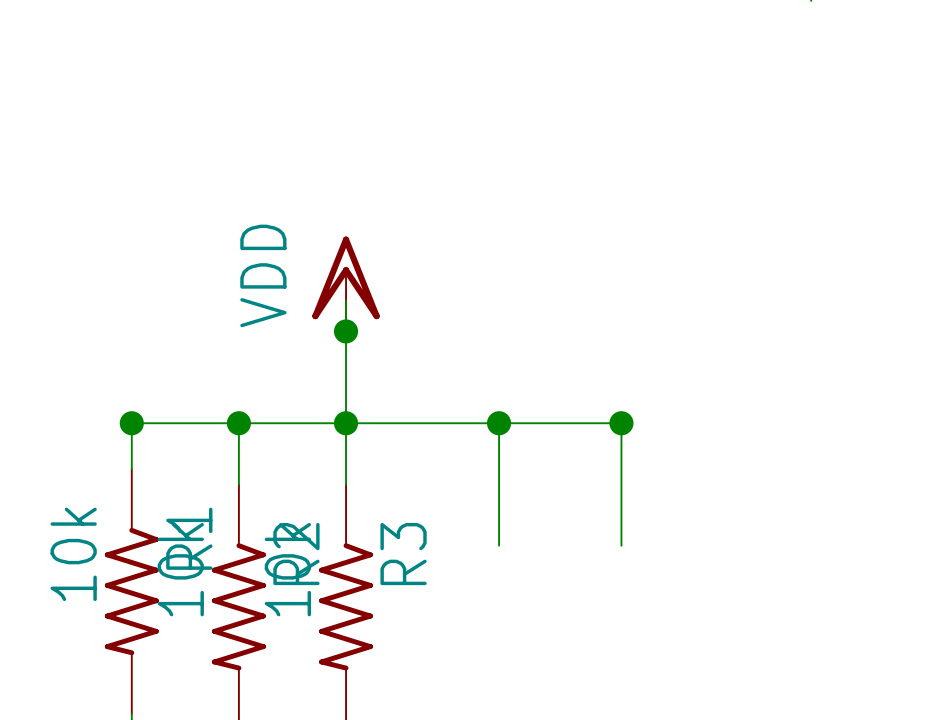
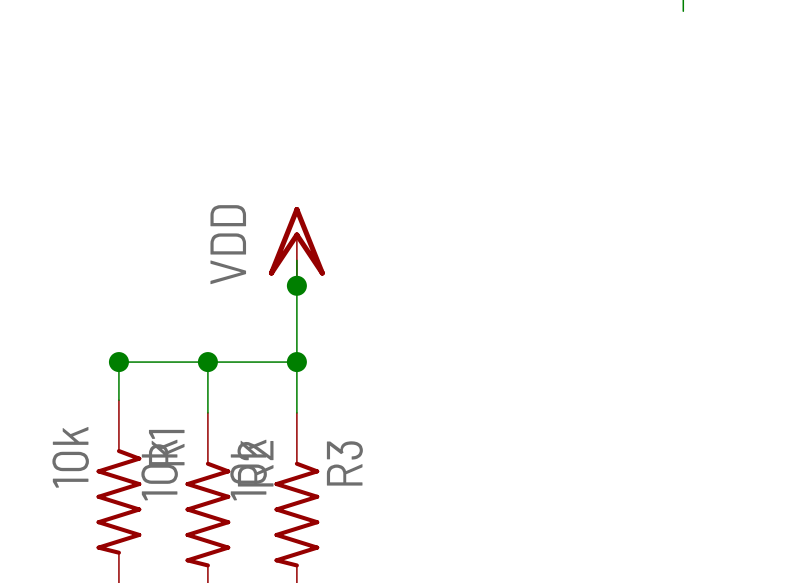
wire: (346, 423) (621, 423) (621, 545) -> none
wire: (499, 423) (499, 545) -> none
junction: (499, 423) -> none
junction: (621, 423) -> none

